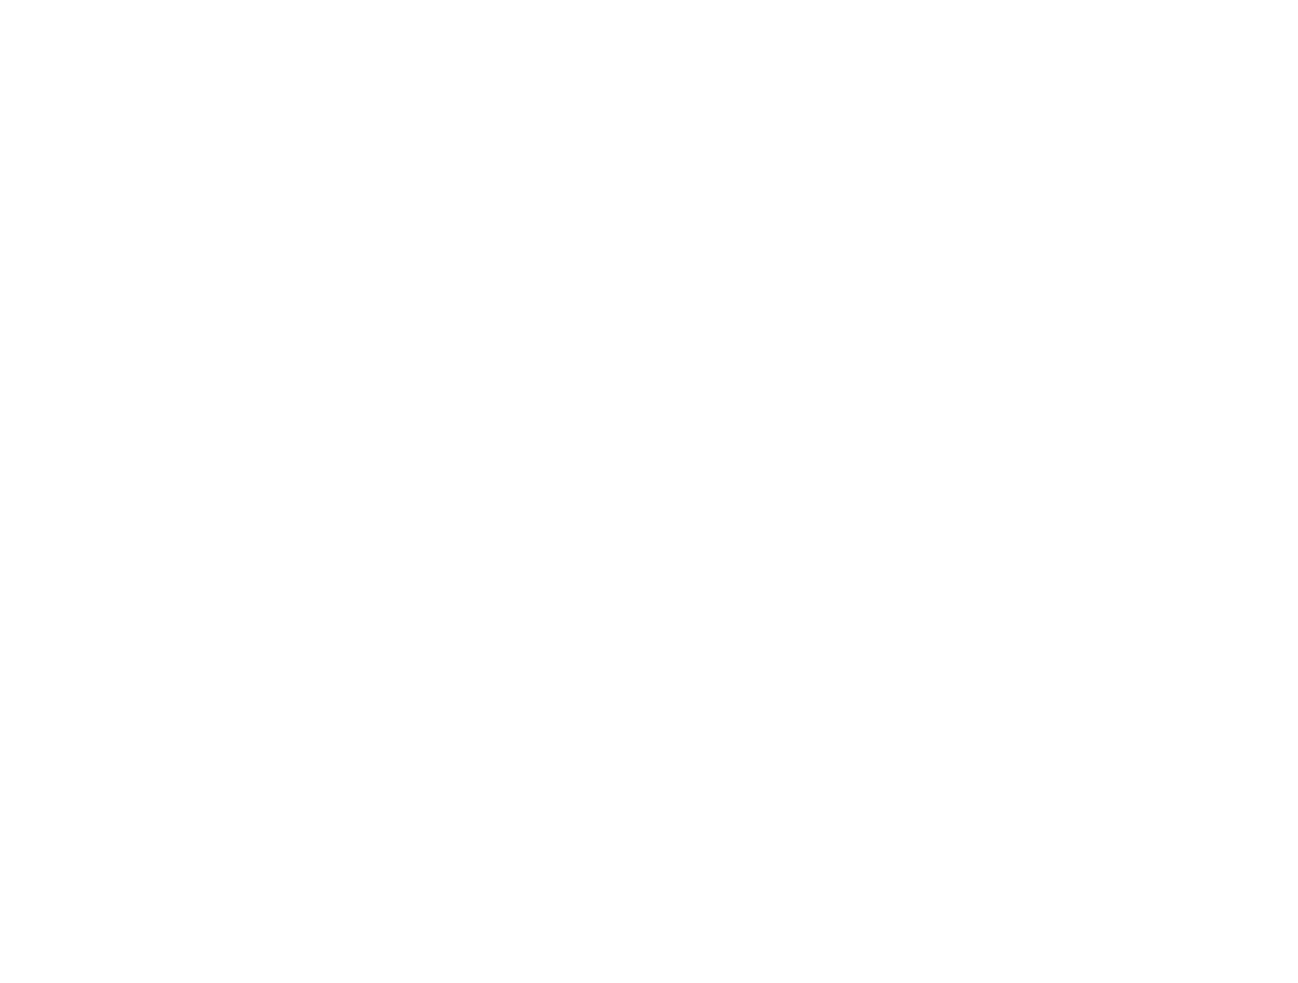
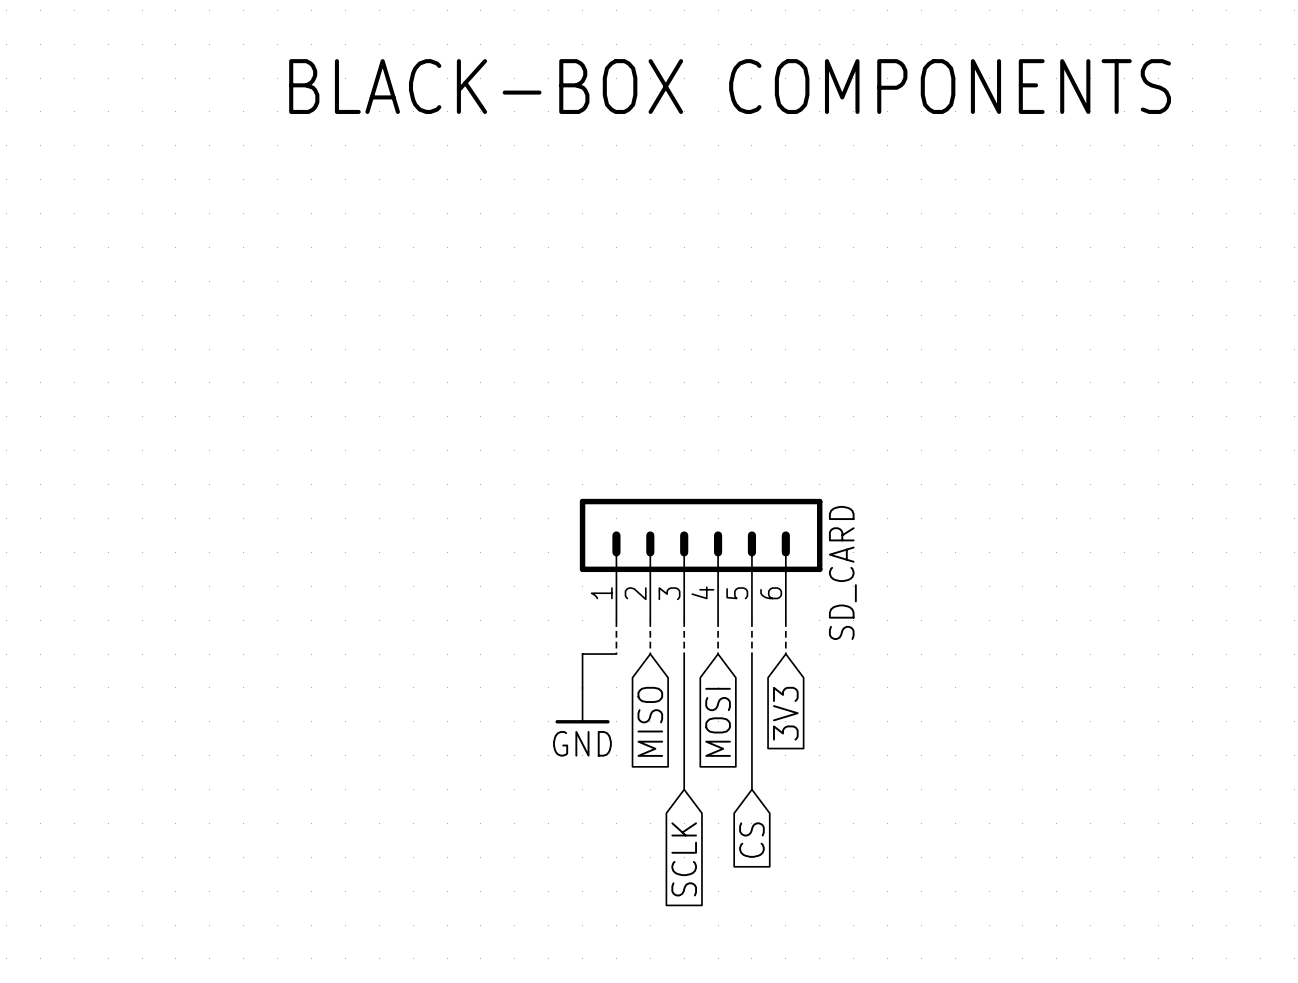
text: none -> BLACK-BOX COMPONENTS (730, 86)
SD_CARD: none -> (701, 559)
wire: none -> (616, 620) (616, 654) (582, 654) (582, 687)
wire: none -> (650, 620) (650, 654)
wire: none -> (684, 620) (684, 789)
wire: none -> (718, 620) (718, 654)
wire: none -> (751, 620) (751, 789)
wire: none -> (785, 620) (785, 654)
power symbol: none -> GND (582, 705)
global label: none -> 3V3 (785, 713)
global label: none -> MISO (650, 721)
global label: none -> MOSI (718, 722)
global label: none -> CS (751, 840)
global label: none -> SCLK (684, 859)

